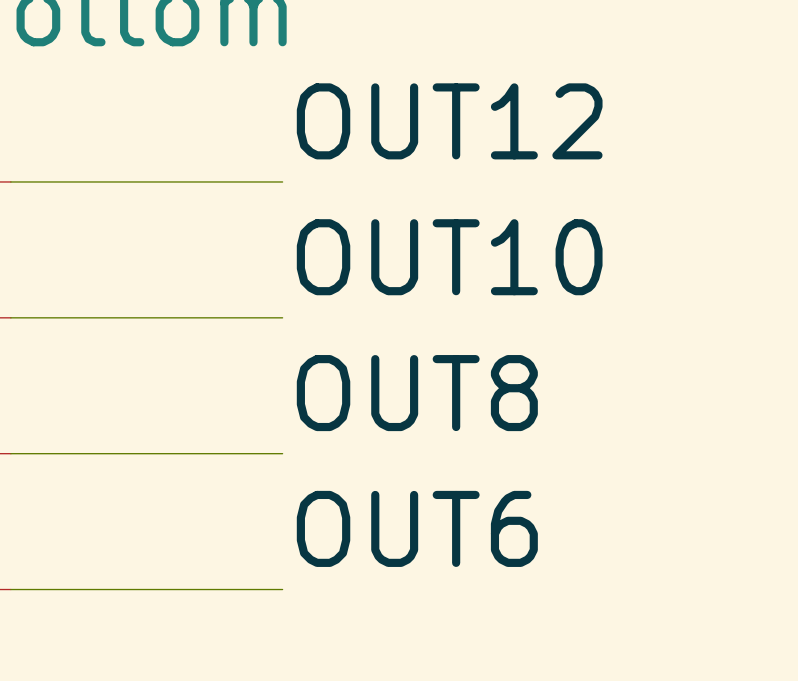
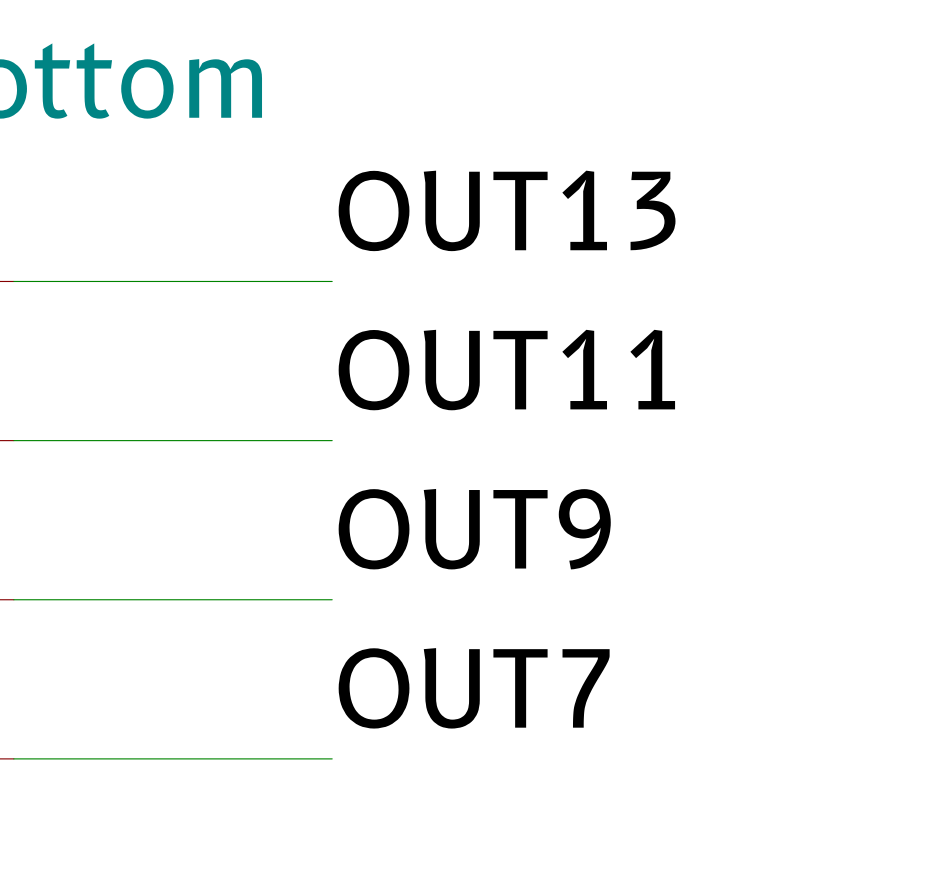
label: OUT12 (449, 121) -> OUT13 (507, 210)
label: OUT10 (449, 257) -> OUT11 (506, 370)
label: OUT8 (417, 393) -> OUT9 (474, 529)
label: OUT6 (417, 528) -> OUT7 (474, 688)

